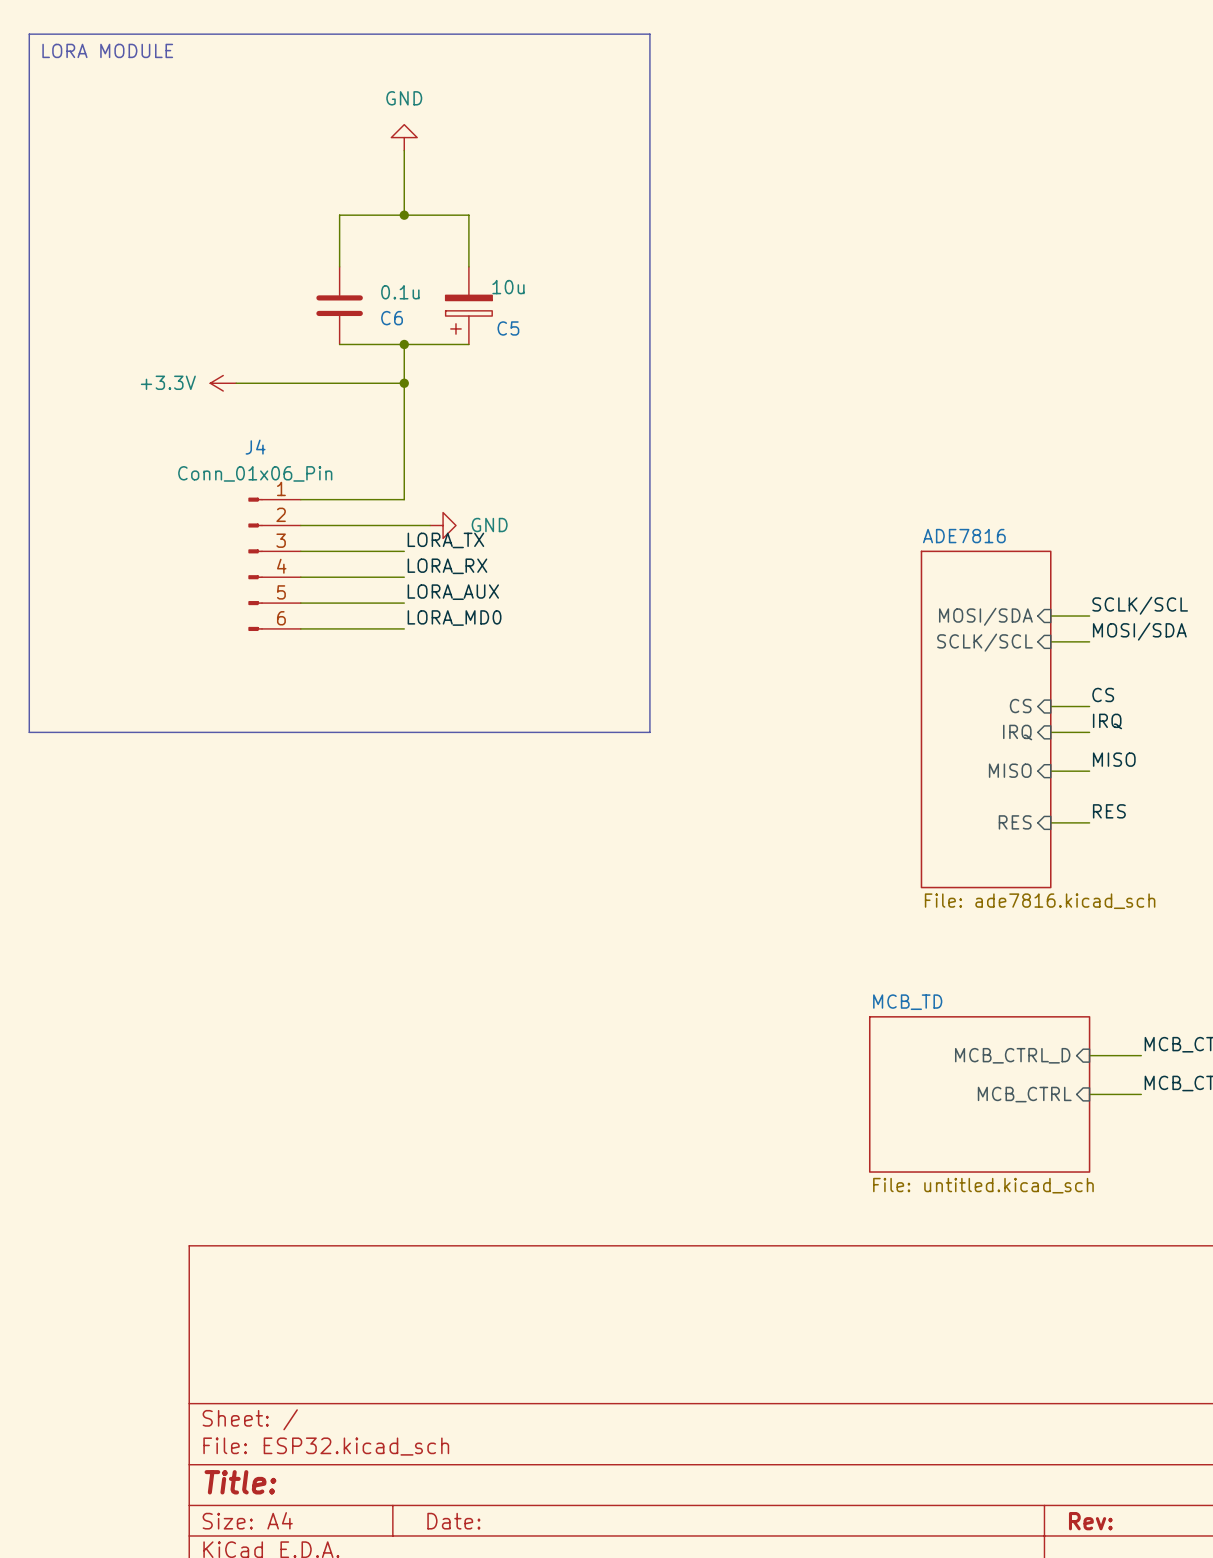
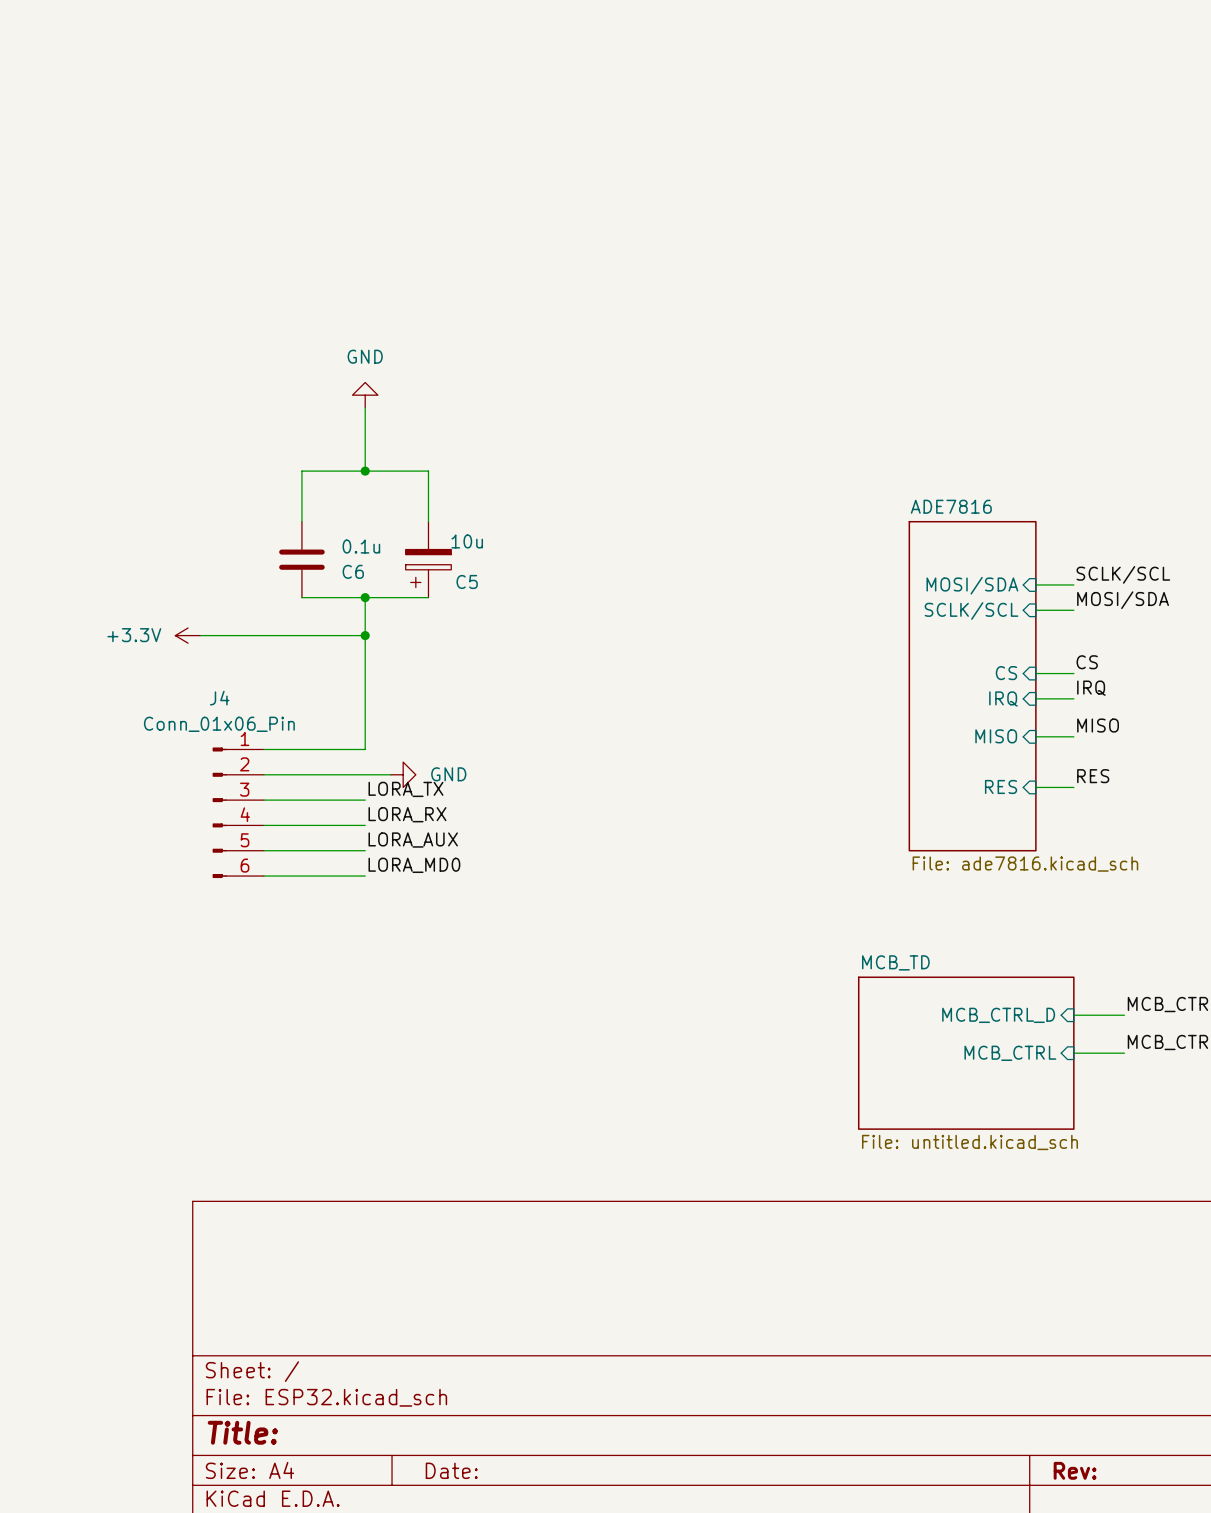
line: (29, 34) (649, 34) (649, 732) (29, 732) (29, 34) -> none
text: LORA MODULE (107, 50) -> none
power symbol: GND (404, 137) -> none
wire: (404, 150) (404, 215) -> none
junction: (404, 215) -> none
wire: (339, 266) (339, 215) (468, 215) (468, 266) -> none
C6 position: (339, 305) -> (301, 559)
C5 position: (468, 305) -> (428, 559)
wire: (339, 344) (468, 344) -> none
wire: (404, 344) (404, 499) -> (428, 521) (428, 471) (403, 471)
junction: (404, 344) -> none
power symbol: +3.3V (223, 383) -> none
wire: (236, 383) (404, 383) -> none
junction: (404, 383) -> none
wire: none -> (365, 407) (365, 471)
junction: none -> (365, 471)
wire: (300, 525) (430, 525) -> none
power symbol rotation: 0° (443, 525) -> 90° counterclockwise (365, 395)
power symbol position: GND (443, 525) -> GND (365, 395)
label: LORA_TX (445, 540) -> none
wire: (300, 551) (404, 551) -> (301, 521) (301, 471)
J4 position: (274, 564) -> (238, 812)
label: LORA_RX (447, 566) -> none
wire: (300, 577) (404, 577) -> none
label: LORA_AUX (453, 592) -> none
wire: (300, 603) (404, 603) -> (263, 800) (365, 800)
label: LORA_MD0 (454, 618) -> none
wire: none -> (365, 597) (365, 749) (263, 749)
junction: none -> (365, 597)
wire: none -> (403, 597) (428, 597)
power symbol: none -> +3.3V (188, 635)
wire: none -> (200, 635) (365, 635)
junction: none -> (365, 635)
wire: none -> (263, 774) (390, 774)
power symbol: none -> GND (403, 774)
label: none -> LORA_TX (405, 789)
label: none -> LORA_RX (407, 814)
wire: none -> (263, 825) (365, 825)
label: none -> LORA_AUX (413, 840)
wire: none -> (263, 850) (365, 850)
label: none -> LORA_MD0 (414, 865)
wire: none -> (263, 876) (365, 876)

